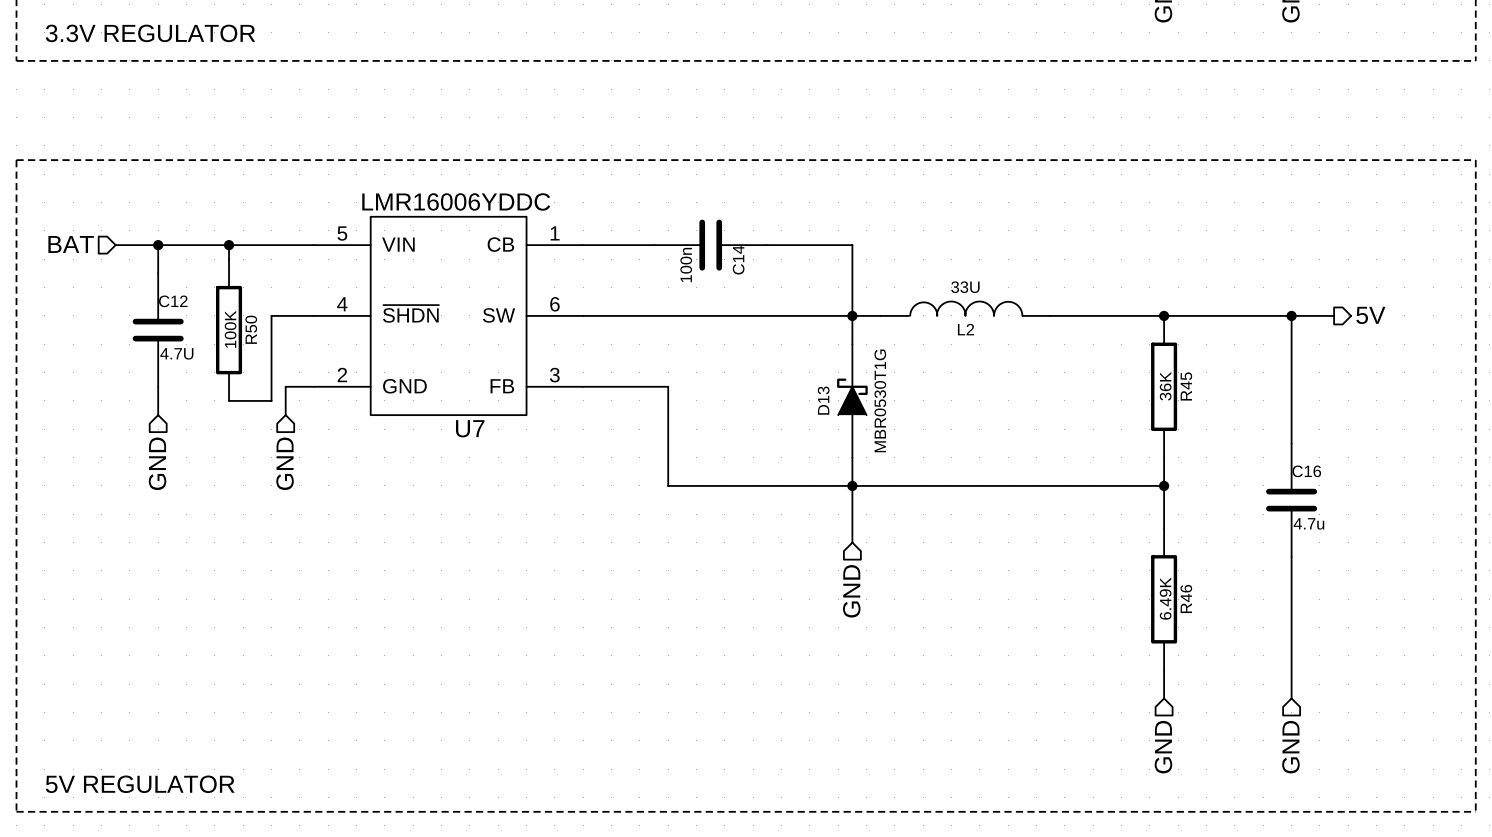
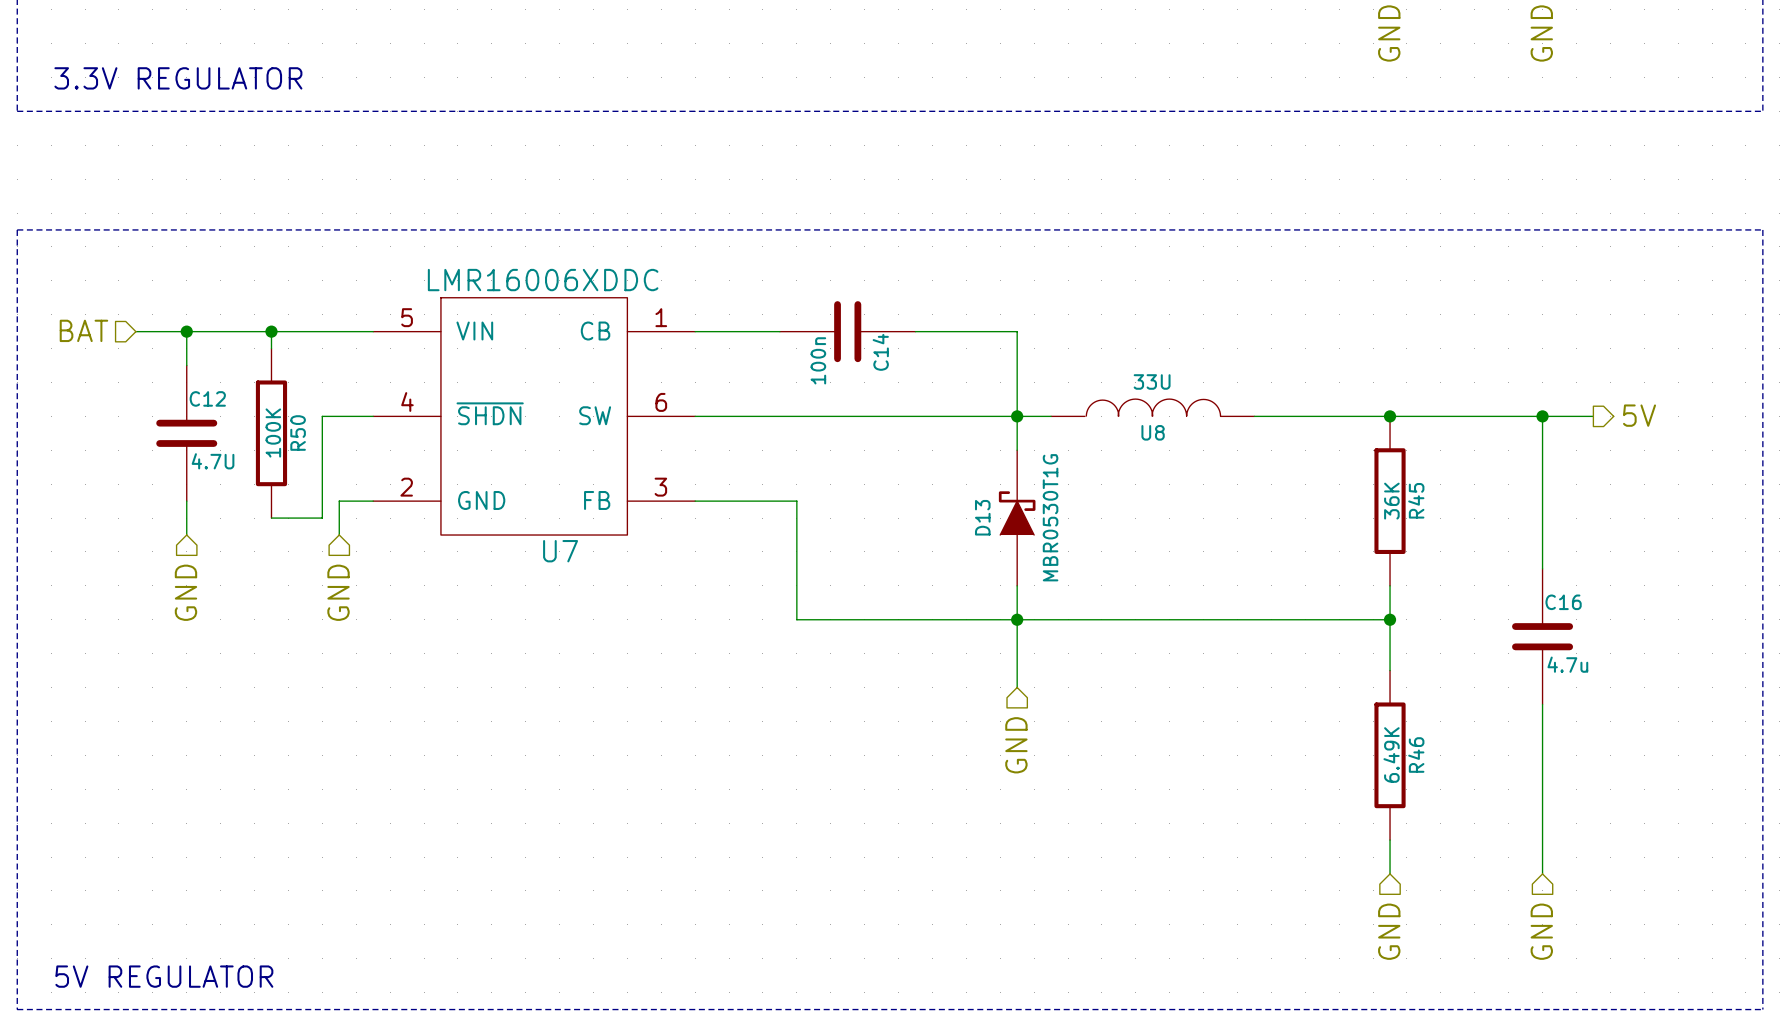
U7 value: LMR16006YDDC (456, 201) -> LMR16006XDDC (543, 280)
L2 name: L2 (966, 329) -> U8 (1153, 432)

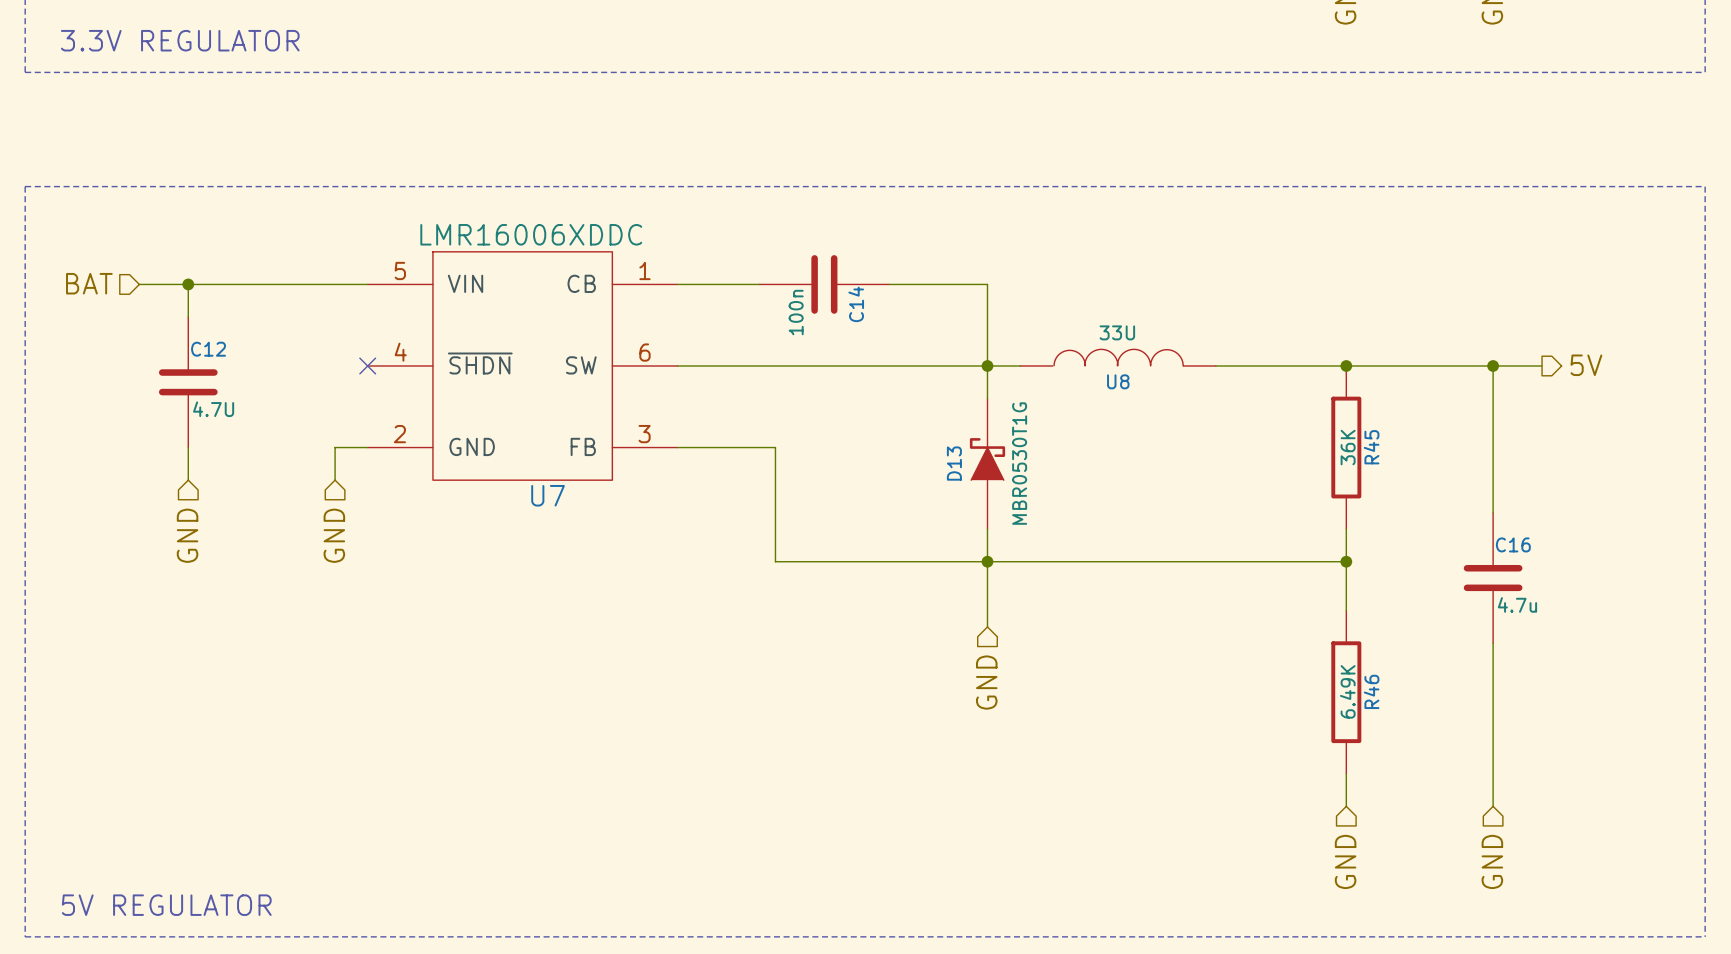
wire: (271, 331) (271, 348) -> none
junction: (271, 331) -> none
wire: (373, 416) (322, 416) (322, 518) (271, 518) -> none
no-connect mark: none -> (367, 366)
R50: 100K (271, 433) -> none

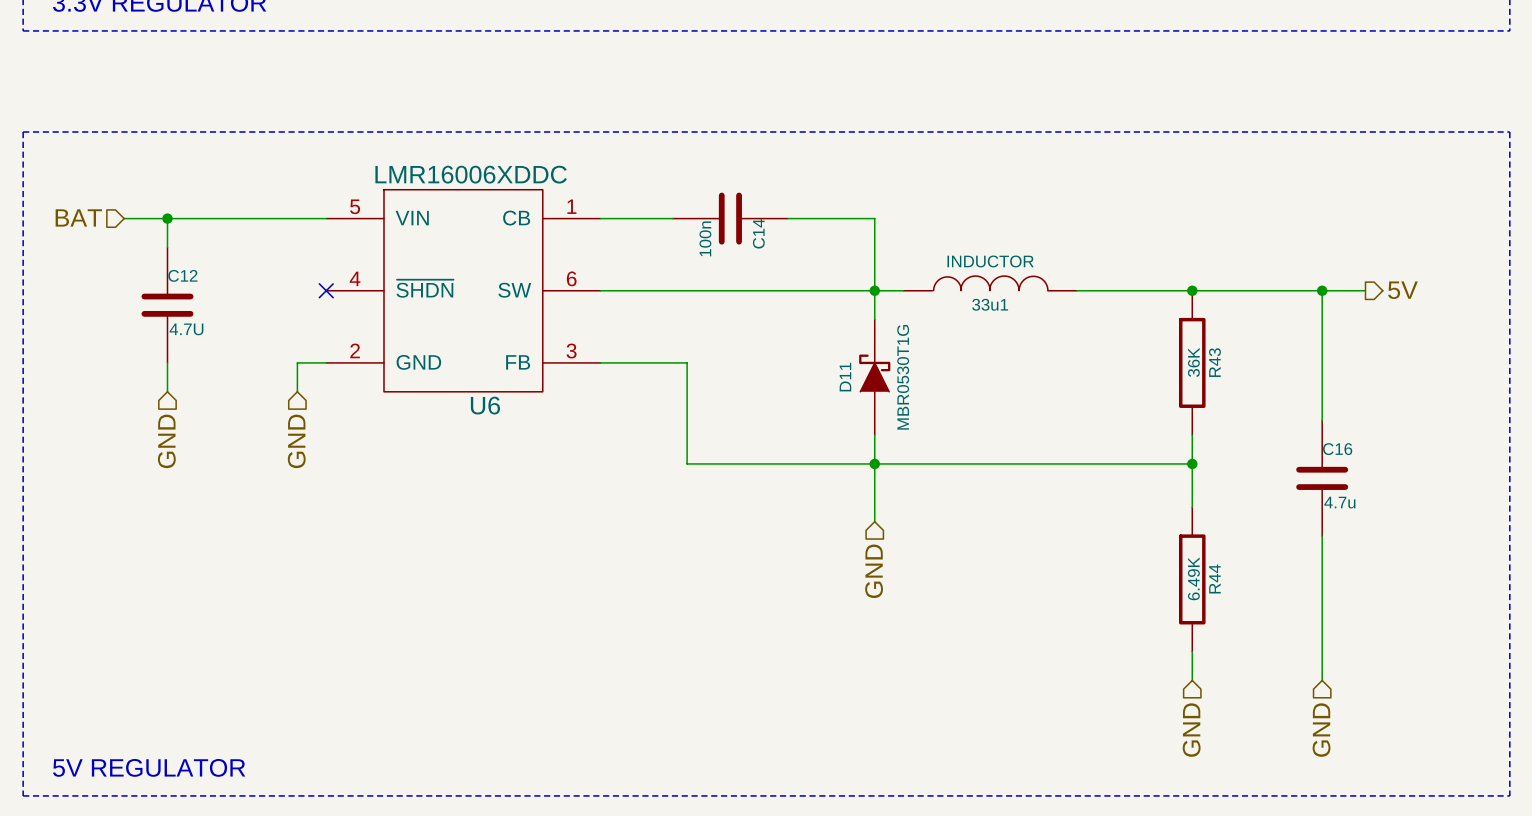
U8 value: 33U (1117, 332) -> INDUCTOR (990, 261)
U8 name: U8 (1118, 381) -> 33u1 (990, 304)
R45 name: R45 (1371, 447) -> R43 (1214, 362)
D13 name: D13 (954, 463) -> D11 (845, 377)
U7 name: U7 (548, 495) -> U6 (485, 405)
R46 name: R46 (1371, 691) -> R44 (1214, 579)

